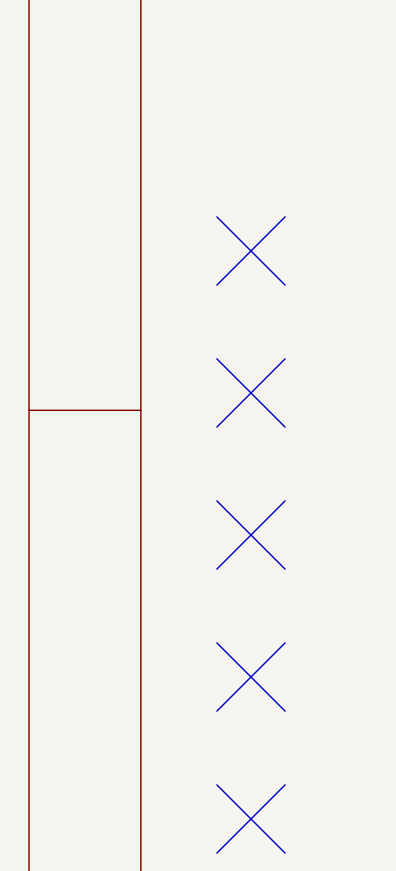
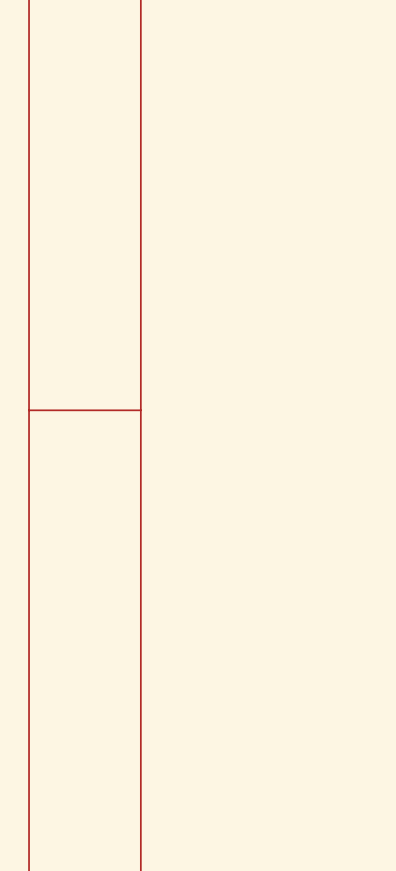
no-connect mark: (250, 250) -> none
no-connect mark: (250, 392) -> none
no-connect mark: (250, 534) -> none
no-connect mark: (250, 676) -> none
no-connect mark: (250, 819) -> none

